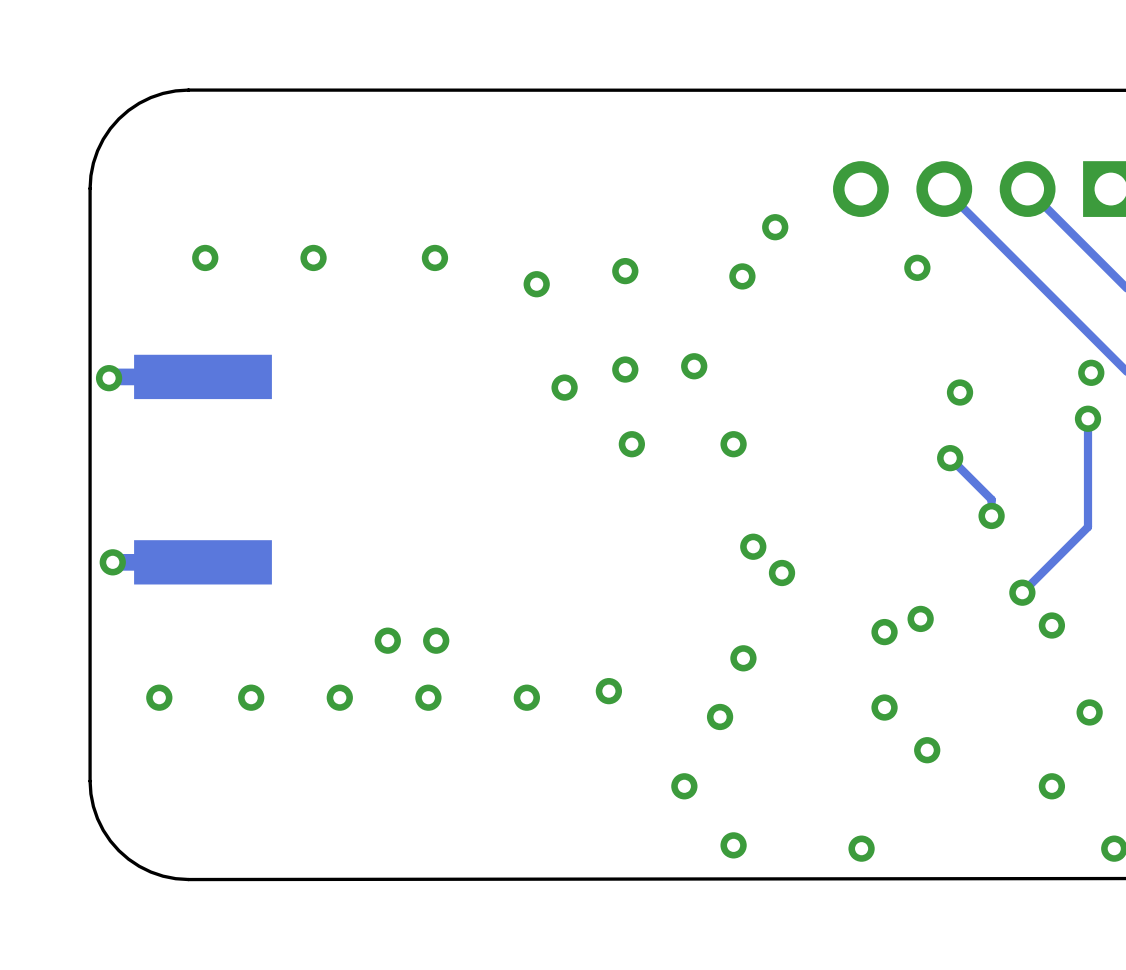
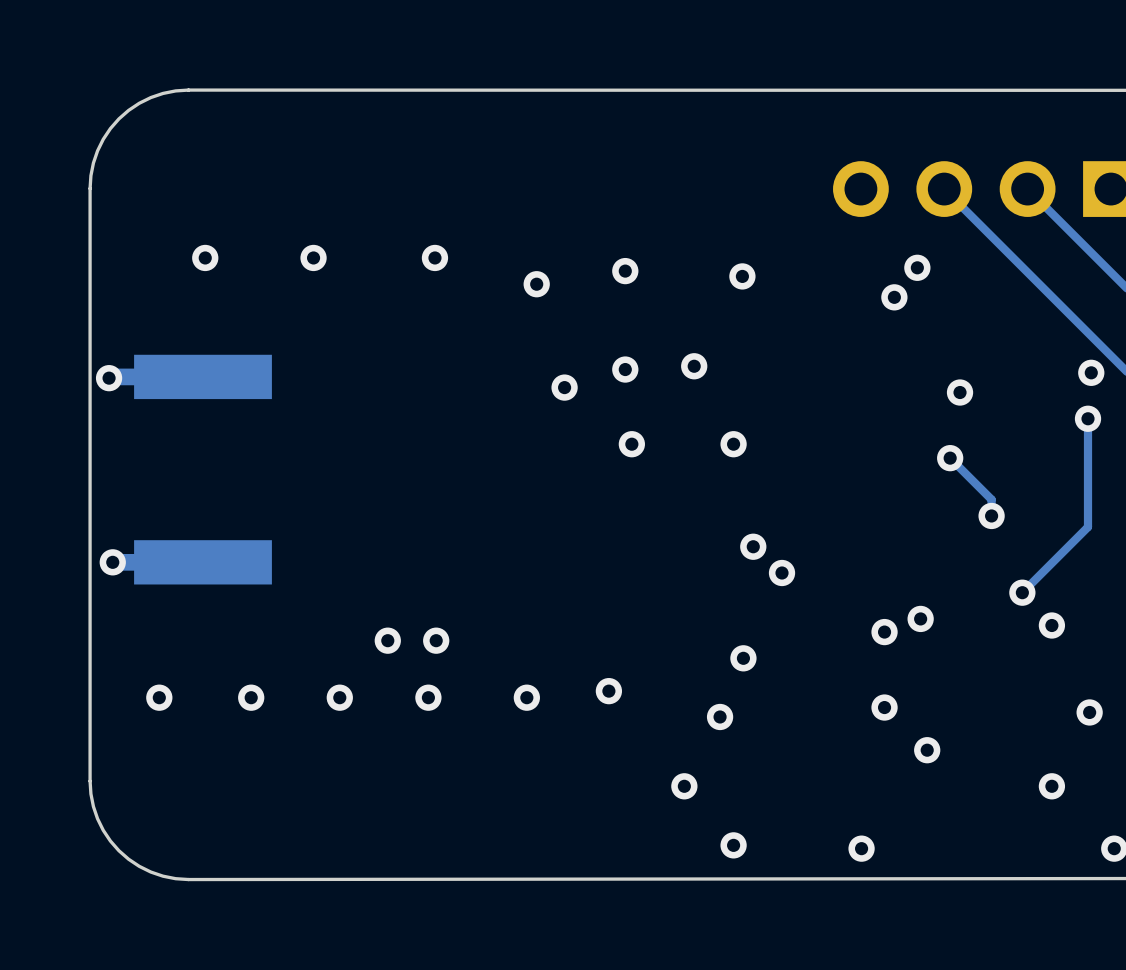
via position: (775, 227) -> (894, 297)

